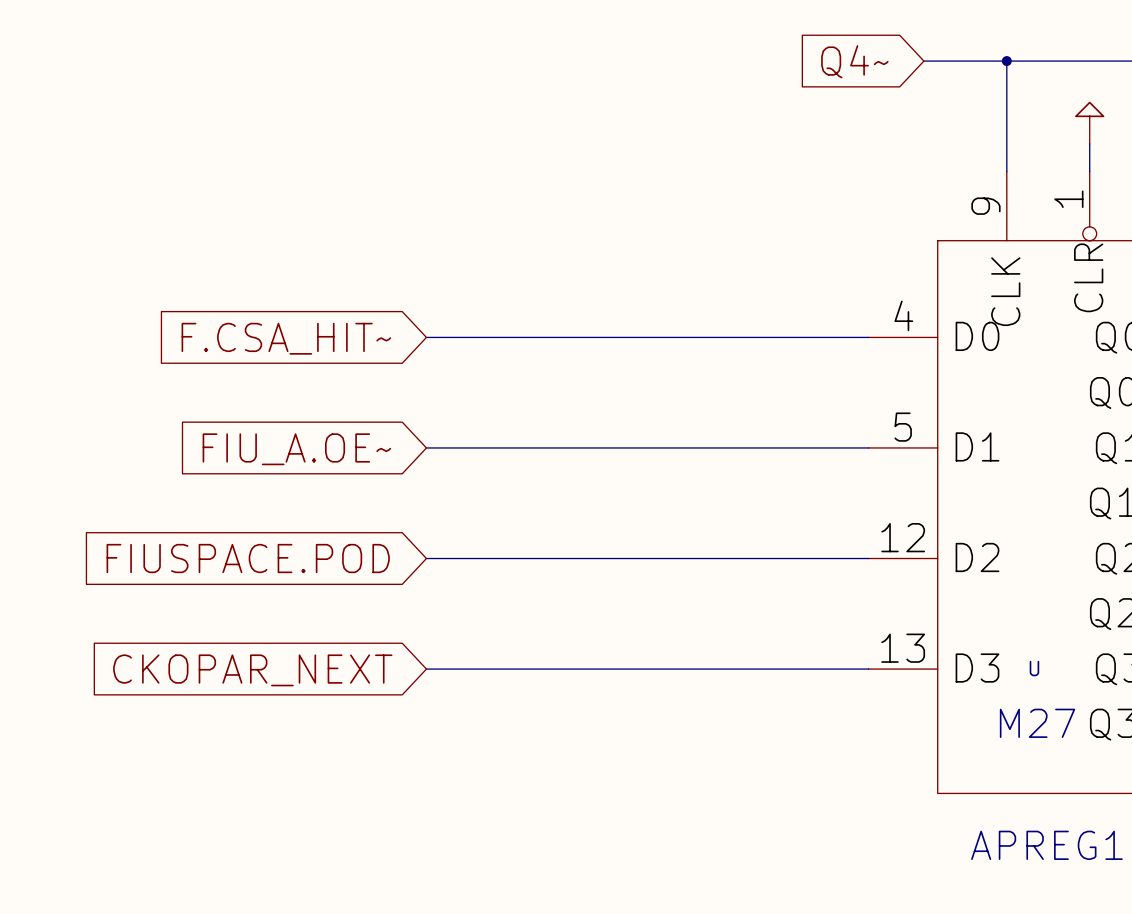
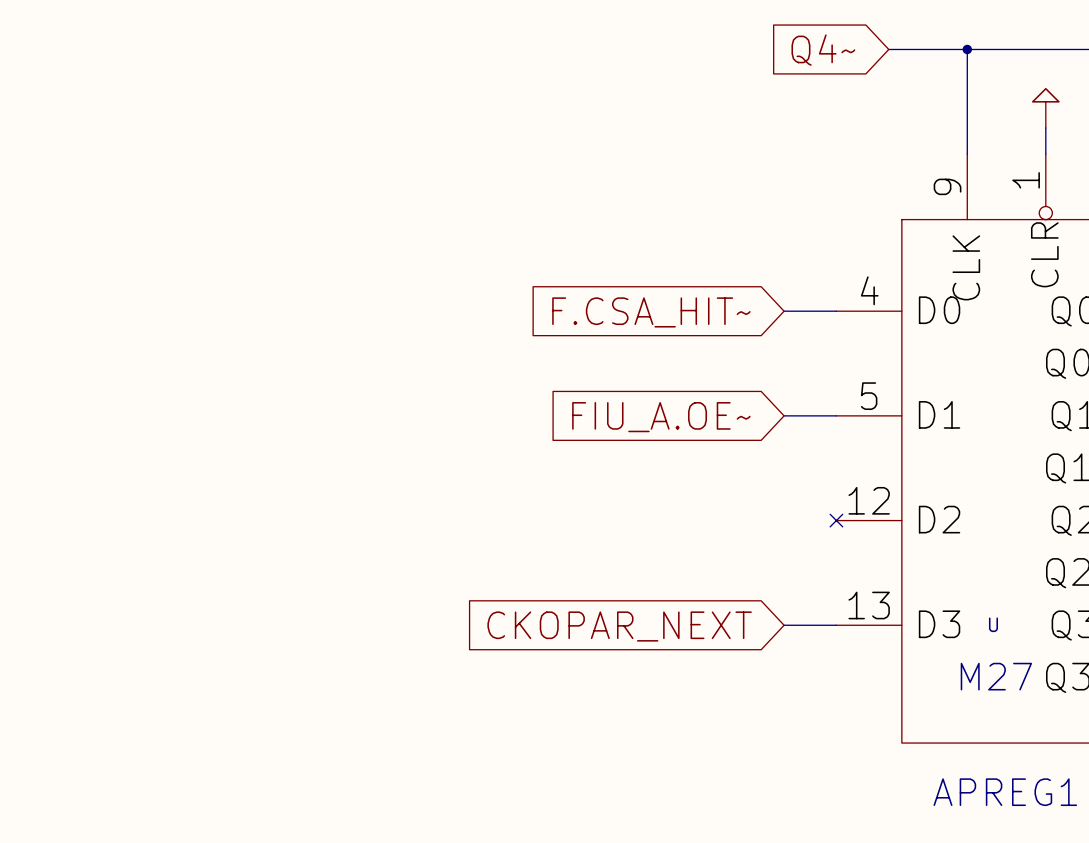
wire: (426, 337) (813, 337) -> none
global label: F.CSA_HIT~ (286, 338) -> none
global label: none -> F.CSA_HIT~ (651, 312)
wire: (426, 447) (813, 447) -> none
global label: FIU_A.OE~ (296, 449) -> none
global label: none -> FIU_A.OE~ (661, 417)
global label: FIUSPACE.POD (248, 558) -> none
wire: (426, 558) (868, 558) -> none
no-connect mark: none -> (836, 520)
wire: (426, 669) (813, 669) -> none
global label: CKOPAR_NEXT (252, 670) -> none
global label: none -> CKOPAR_NEXT (619, 626)

